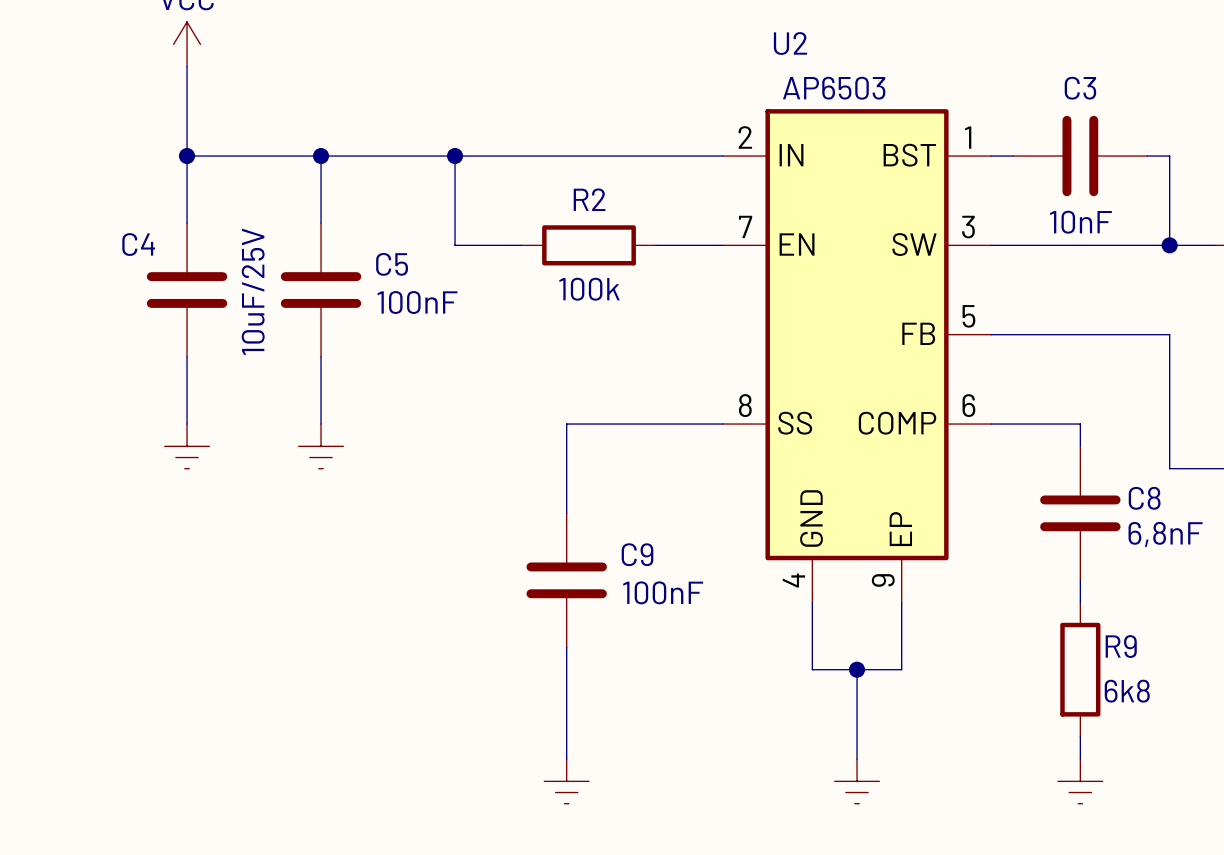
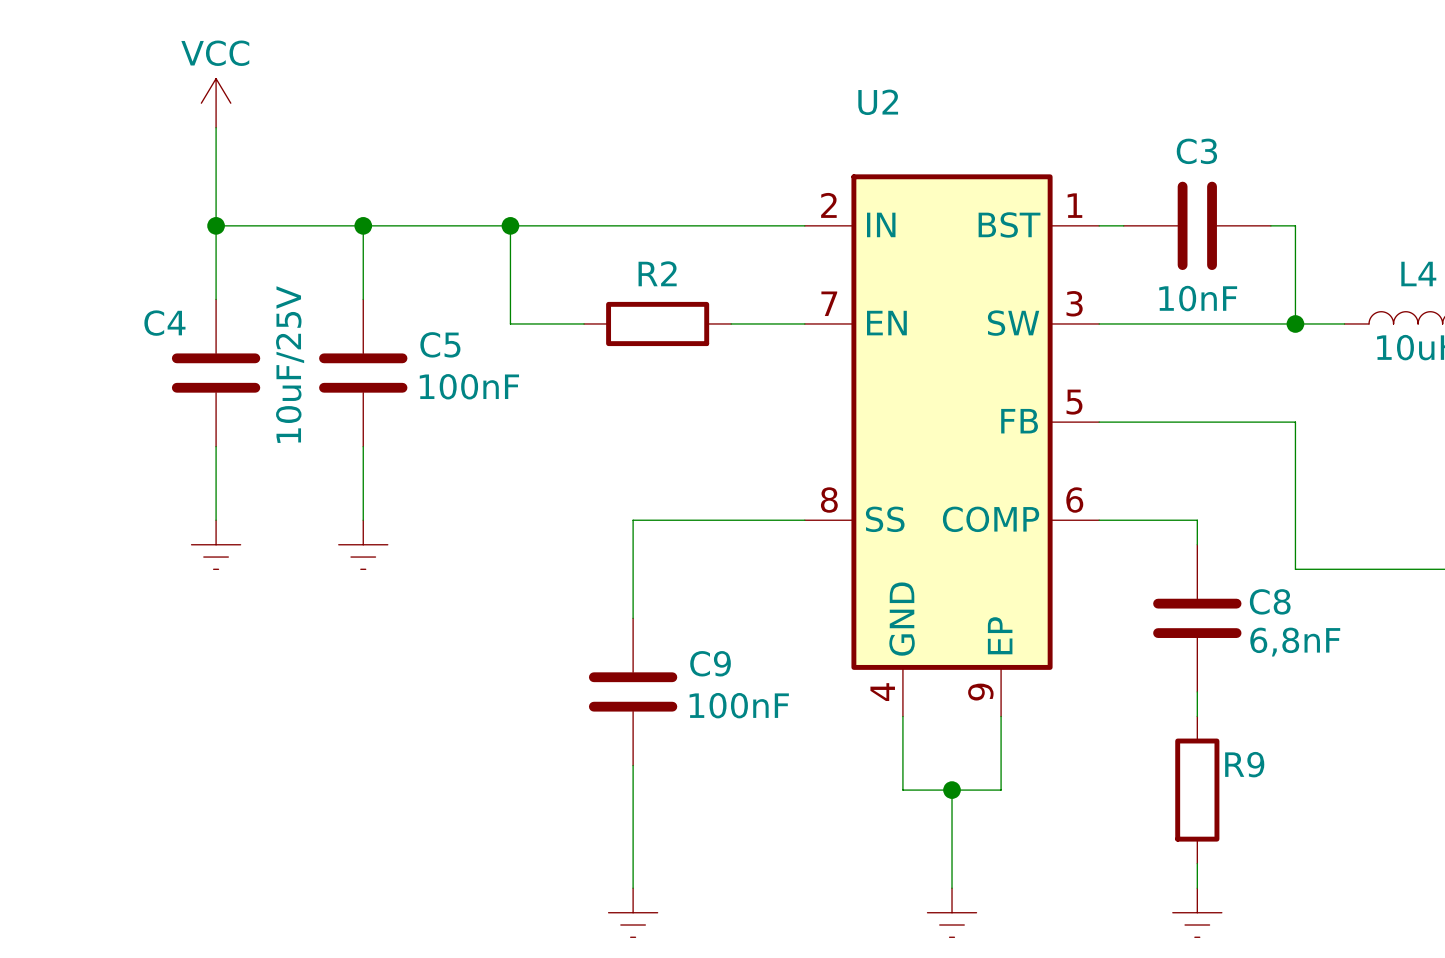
U2 value: AP6503 (834, 88) -> none
R2 value: 100k (589, 289) -> none
R9 value: 6k8 (1127, 691) -> none

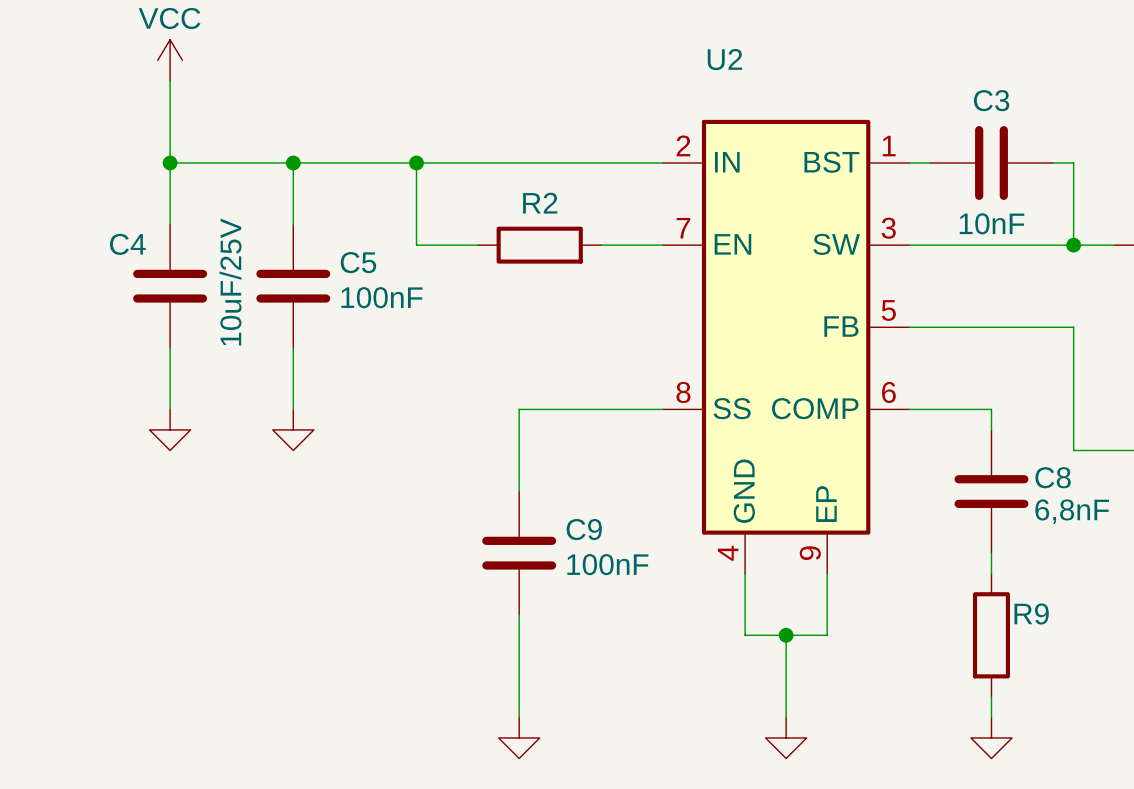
power symbol shape: [191, 520, 241, 570] -> [149, 409, 191, 451]
power symbol shape: [338, 520, 388, 570] -> [272, 409, 314, 451]
power symbol shape: [608, 888, 658, 938] -> [498, 717, 540, 759]
power symbol shape: [927, 888, 977, 938] -> [765, 717, 807, 759]
power symbol shape: [1172, 888, 1222, 938] -> [970, 717, 1013, 759]

